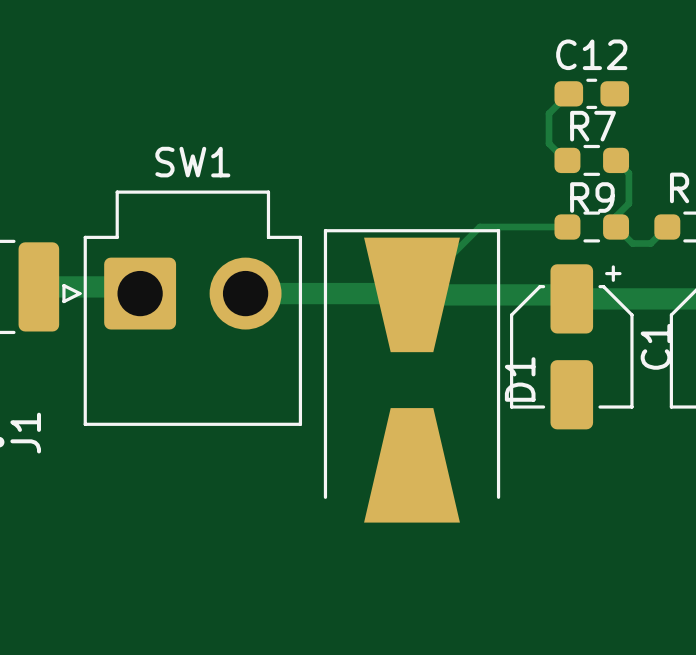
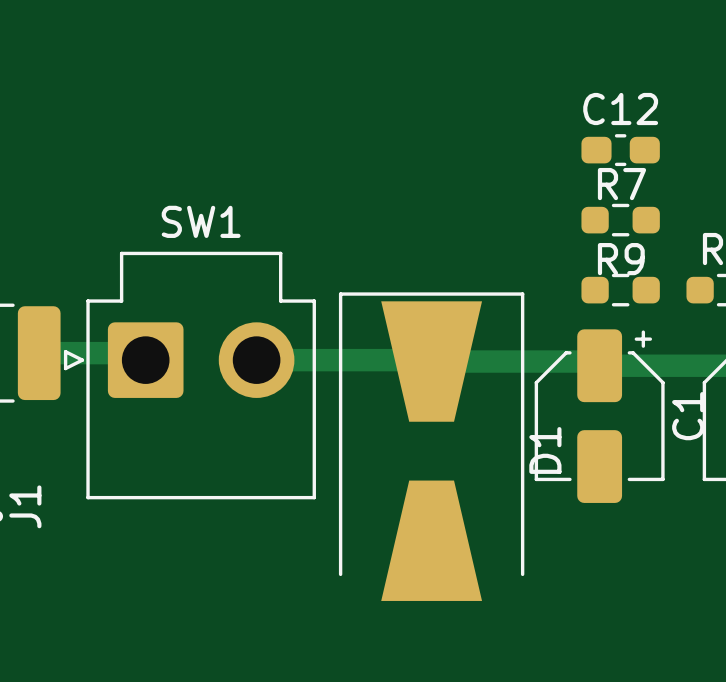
track: (568, 93) (549, 113) (549, 143) (567, 160) -> none
track: (616, 160) (628, 173) (628, 203) (616, 216) (616, 226) (632, 243) (650, 243) (667, 226) -> none
track: (567, 226) (479, 226) (412, 294) -> none

